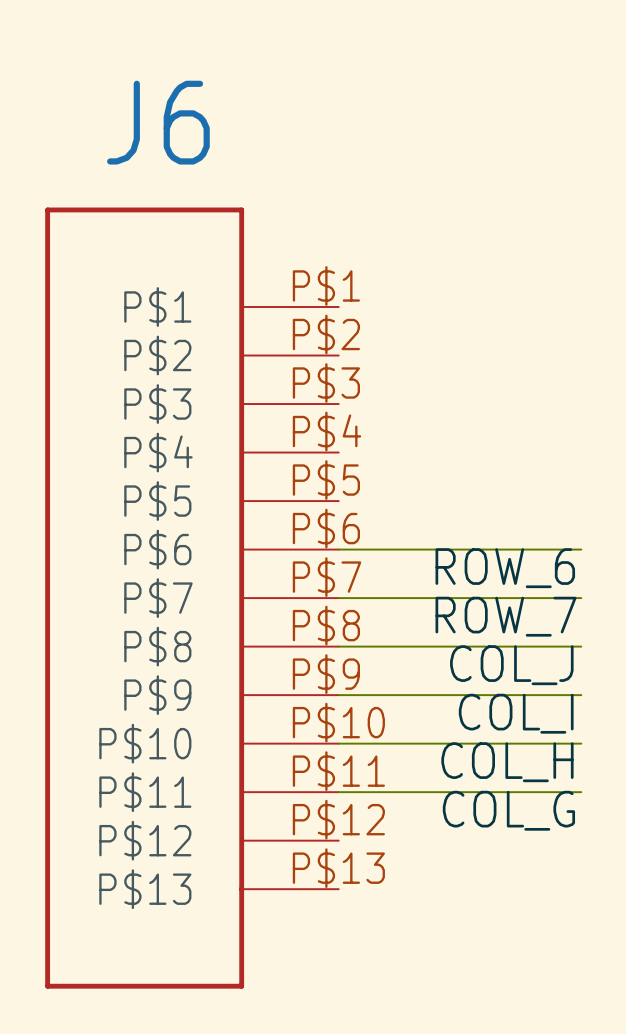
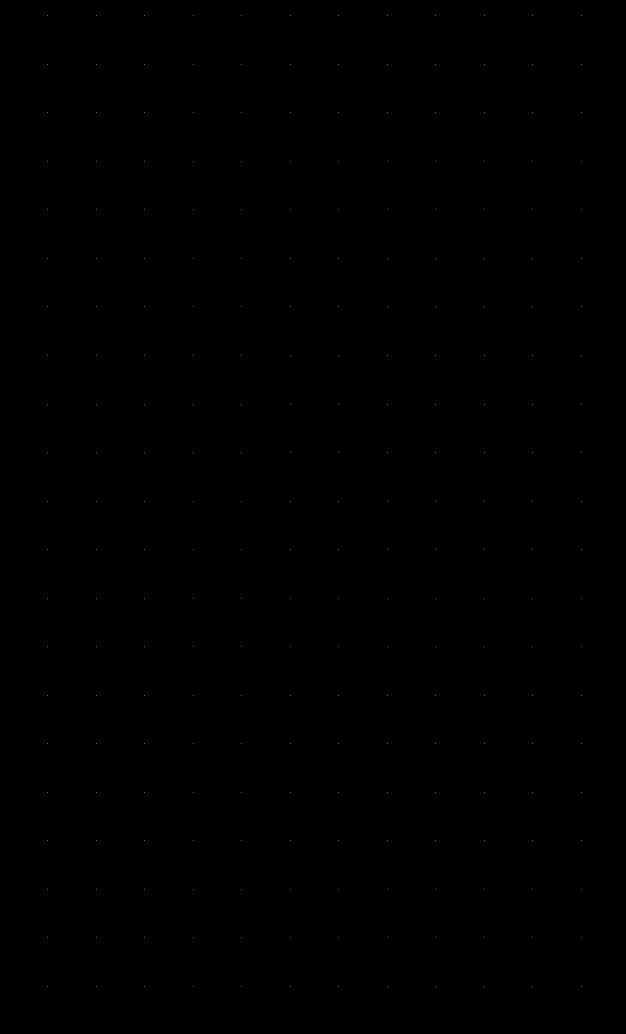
text: J6 (158, 122) -> none
wire: (338, 549) (581, 549) -> none
label: ROW_6 (505, 568) -> none
part: (191, 598) -> none
wire: (338, 598) (581, 598) -> none
label: ROW_7 (506, 616) -> none
wire: (338, 646) (581, 646) -> none
label: COL_J (511, 665) -> none
wire: (338, 695) (581, 695) -> none
label: COL_I (516, 713) -> none
wire: (338, 743) (581, 743) -> none
label: COL_H (507, 762) -> none
wire: (338, 792) (581, 792) -> none
label: COL_G (508, 810) -> none

